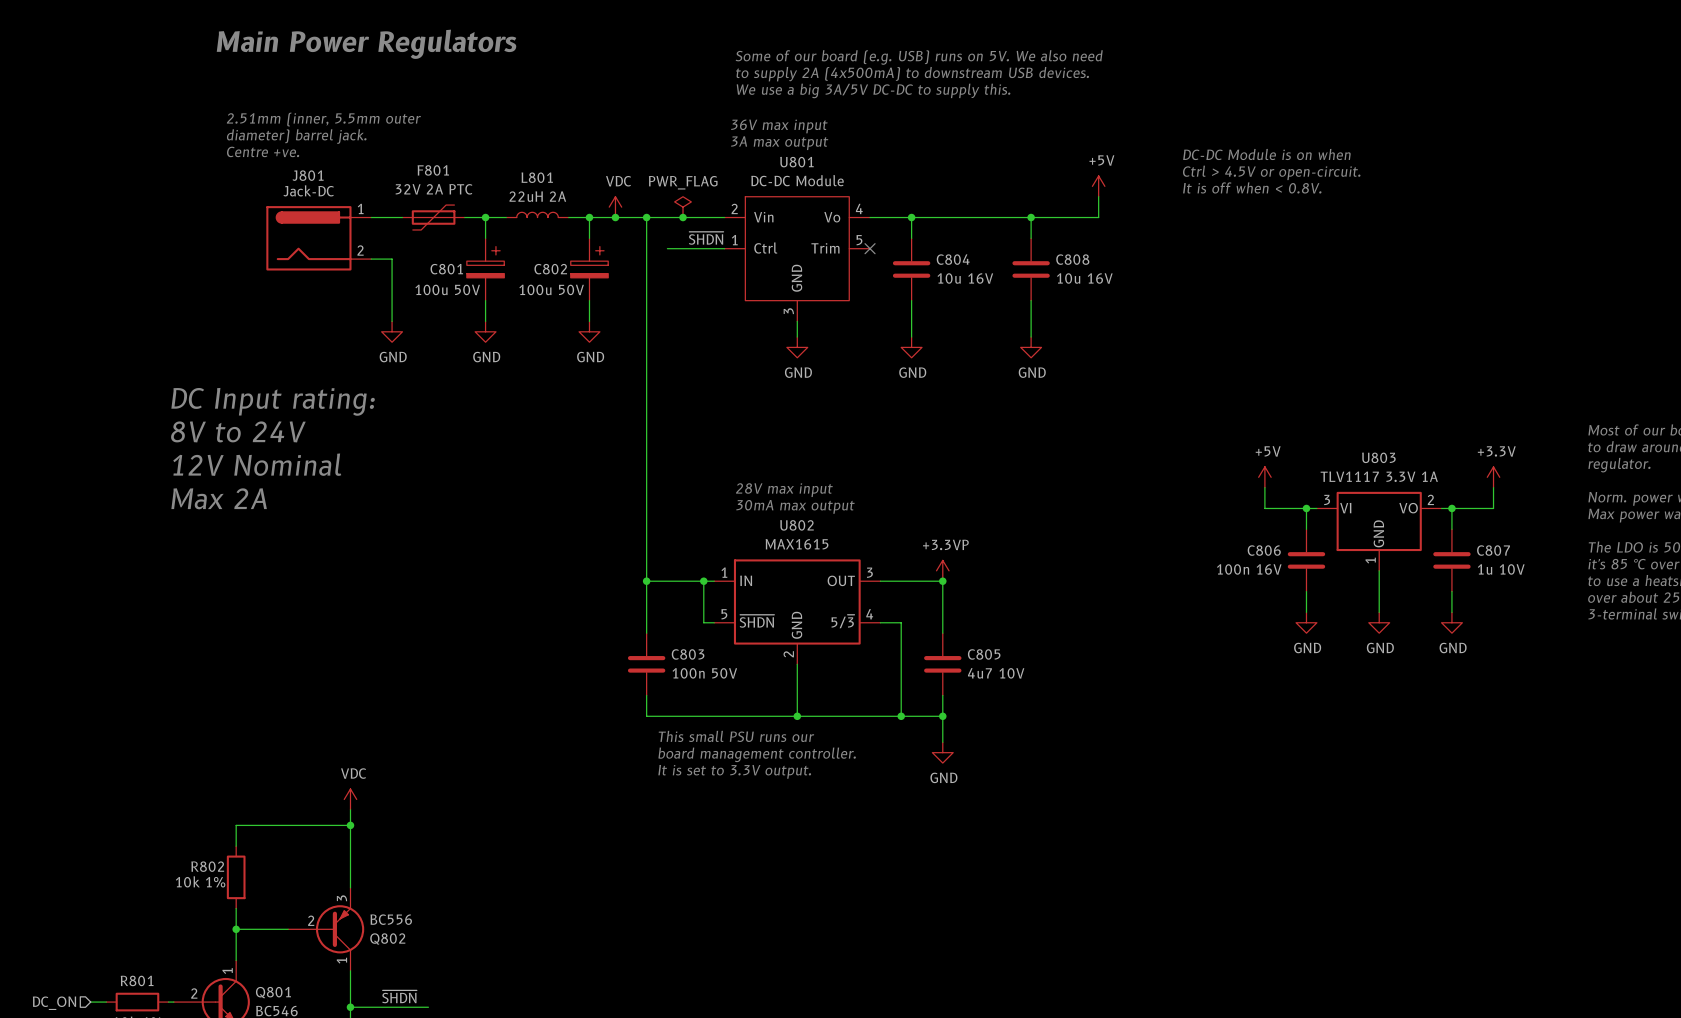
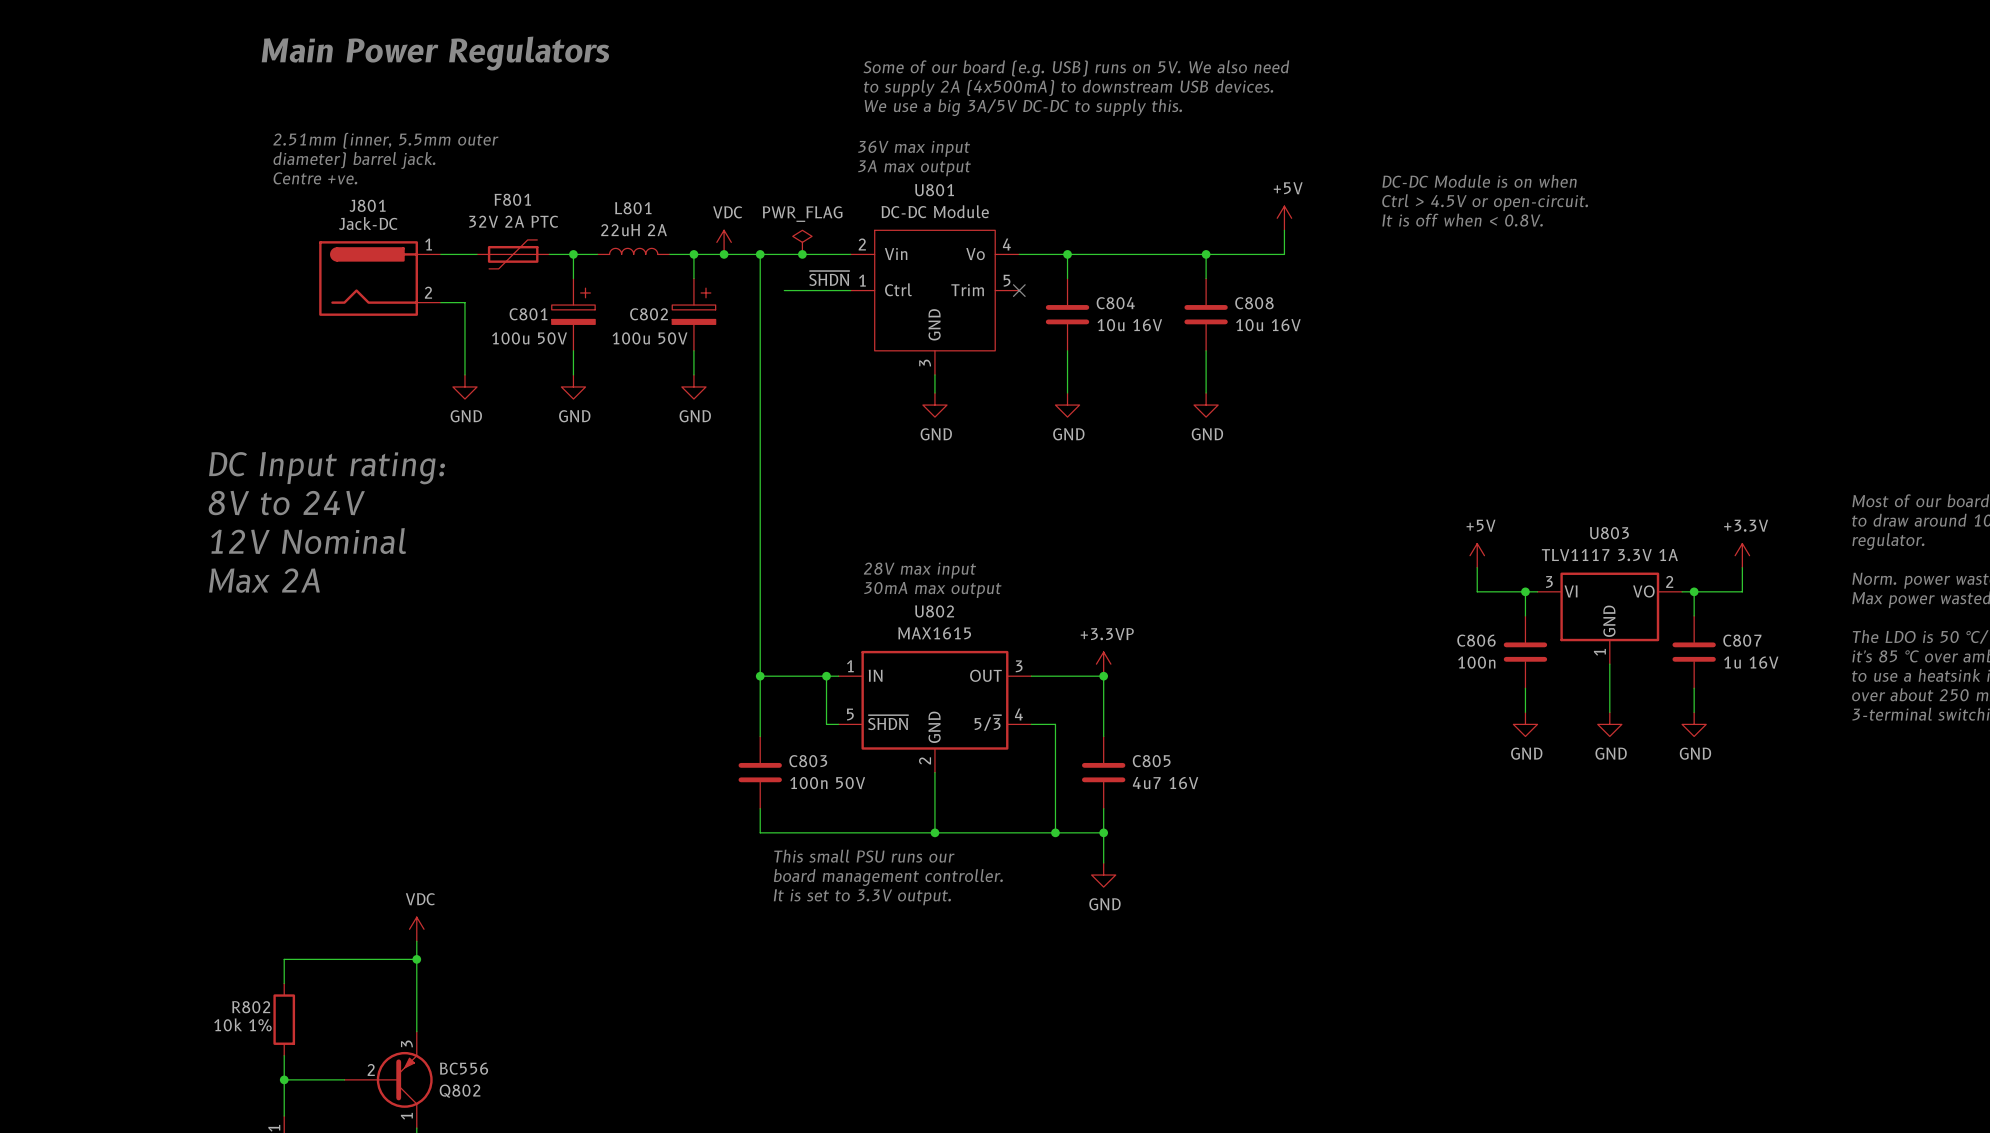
C806 value: 100n 16V (1249, 569) -> 100n (1476, 662)
C807 value: 1u 10V (1501, 569) -> 1u 16V (1751, 662)
C805 value: 4u7 10V (996, 673) -> 4u7 16V (1165, 783)

